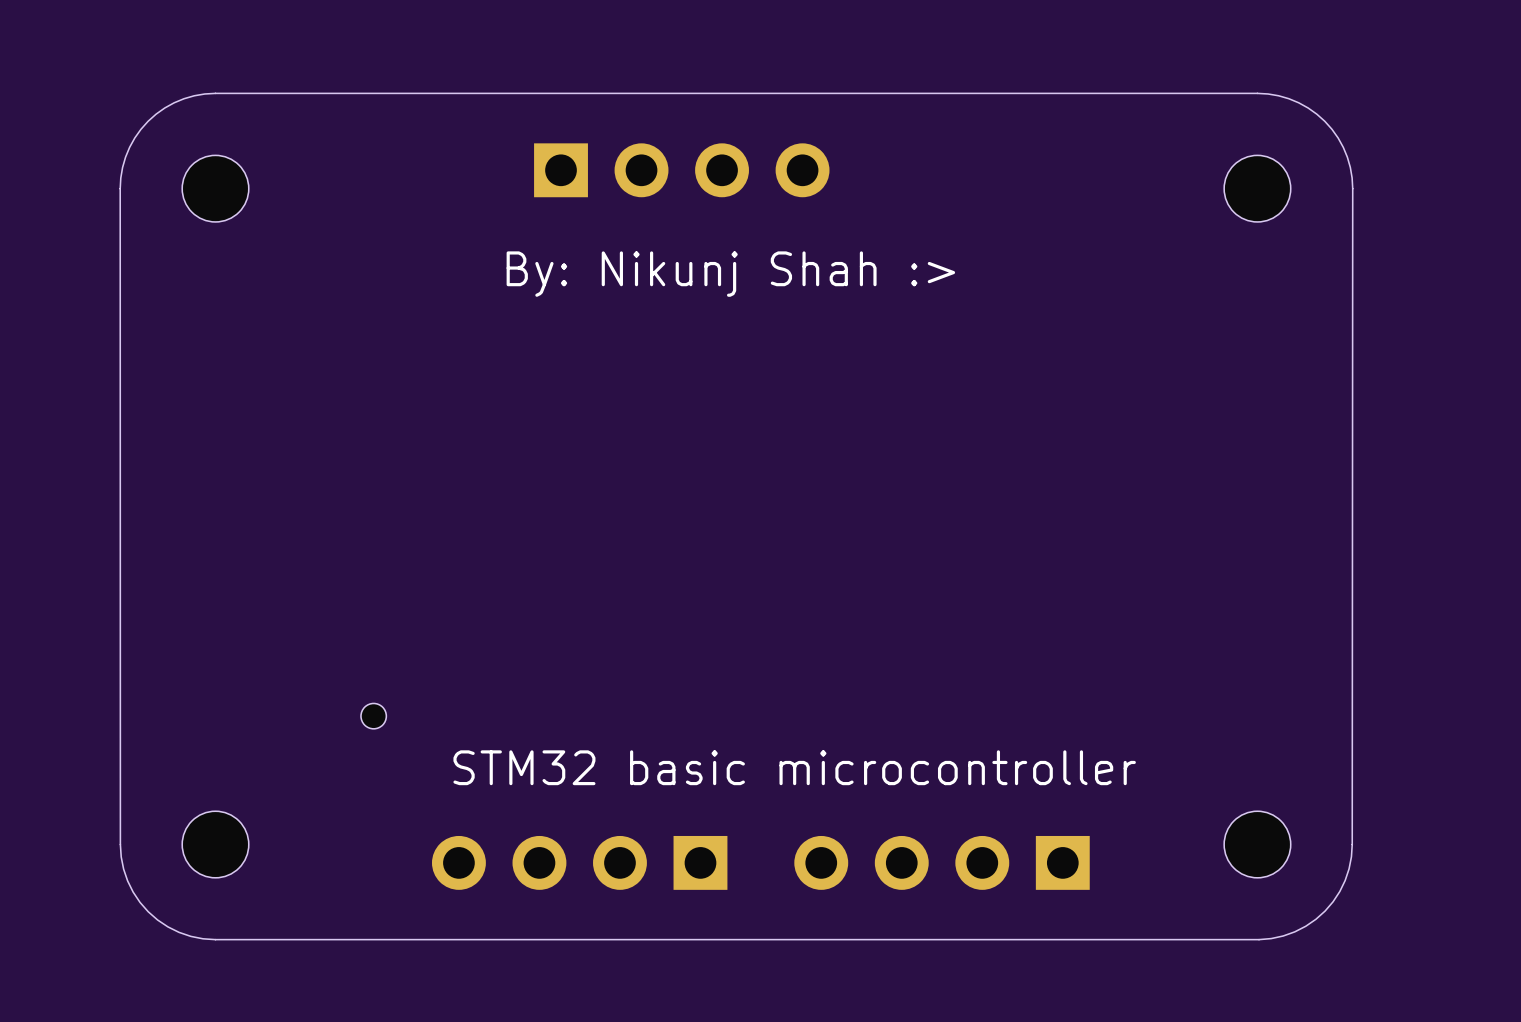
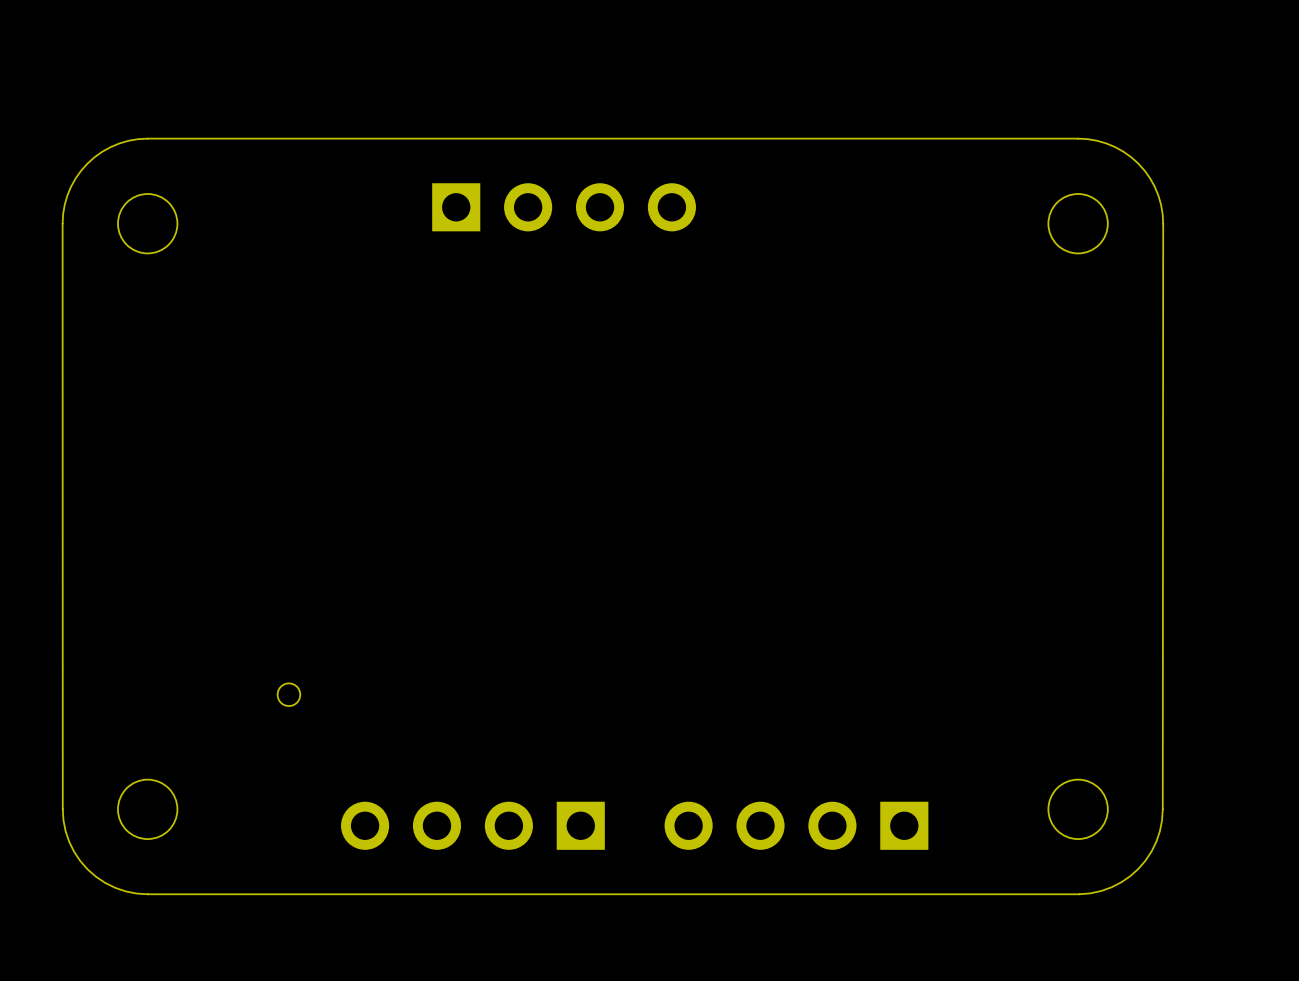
text: By: Nikunj Shah :> (730, 274) -> none
text: STM32 basic microcontroller (794, 767) -> none

